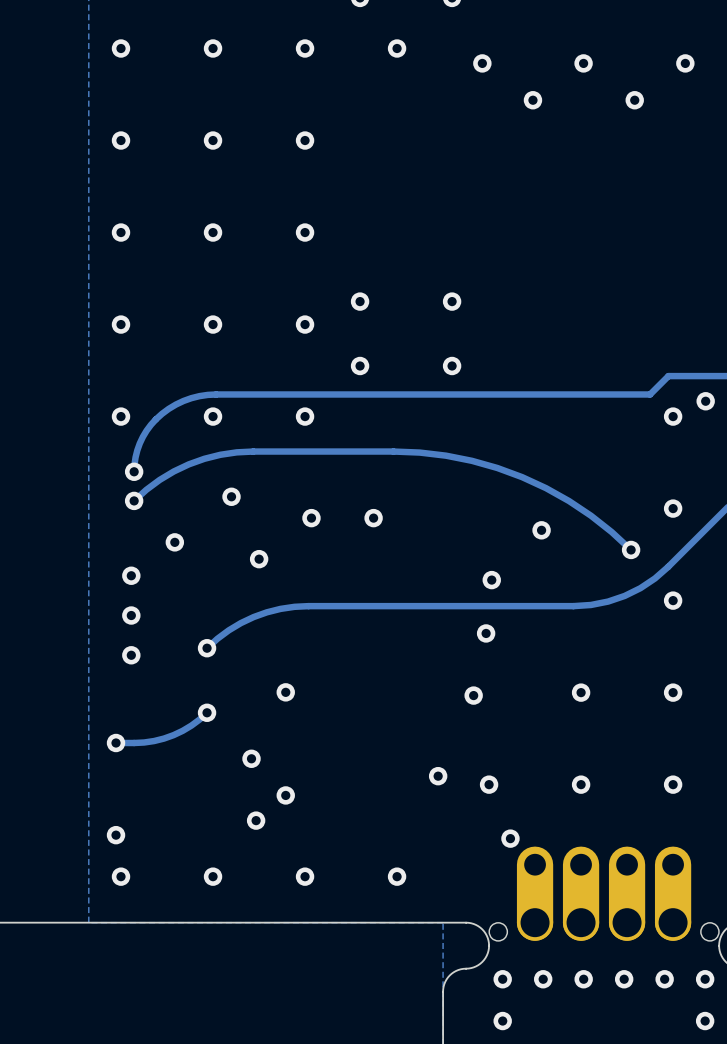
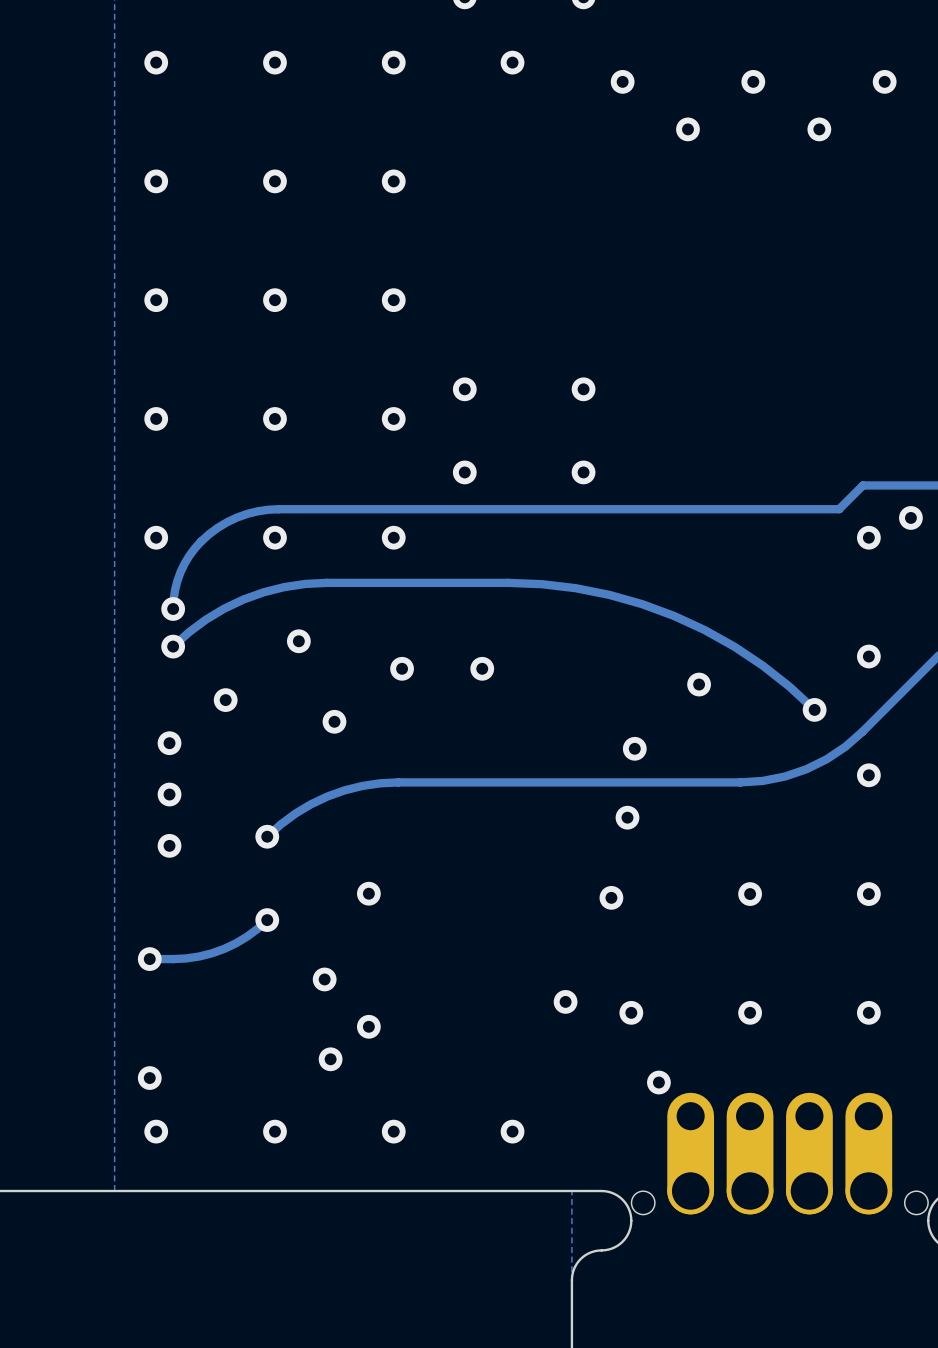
via: (502, 979) -> none
via: (543, 979) -> none
via: (583, 979) -> none
via: (624, 979) -> none
via: (664, 979) -> none
via: (705, 979) -> none
via: (502, 1021) -> none
via: (705, 1021) -> none

